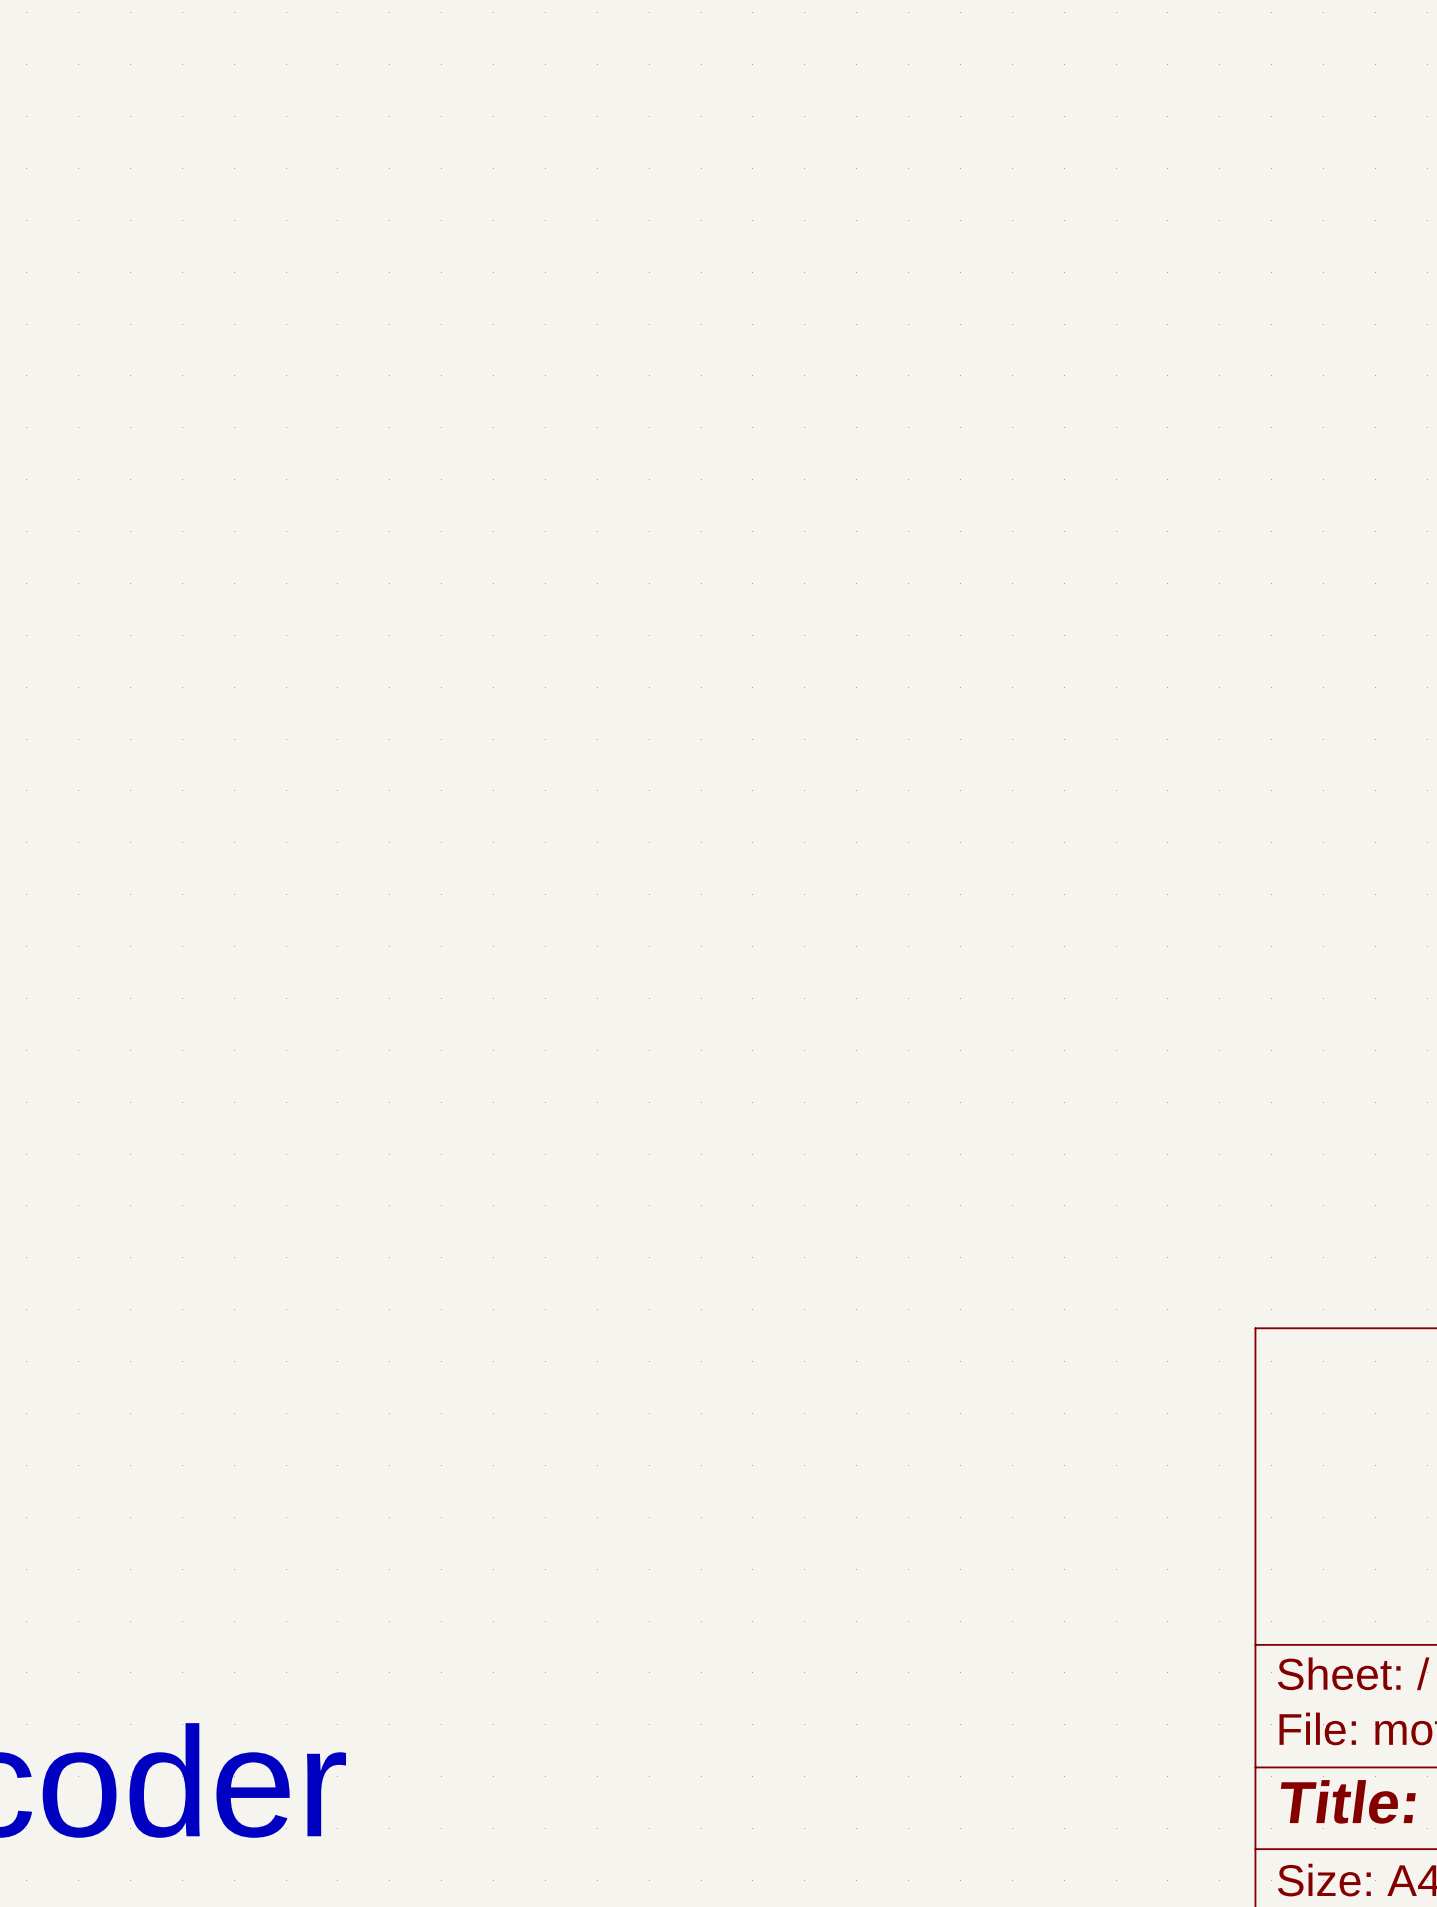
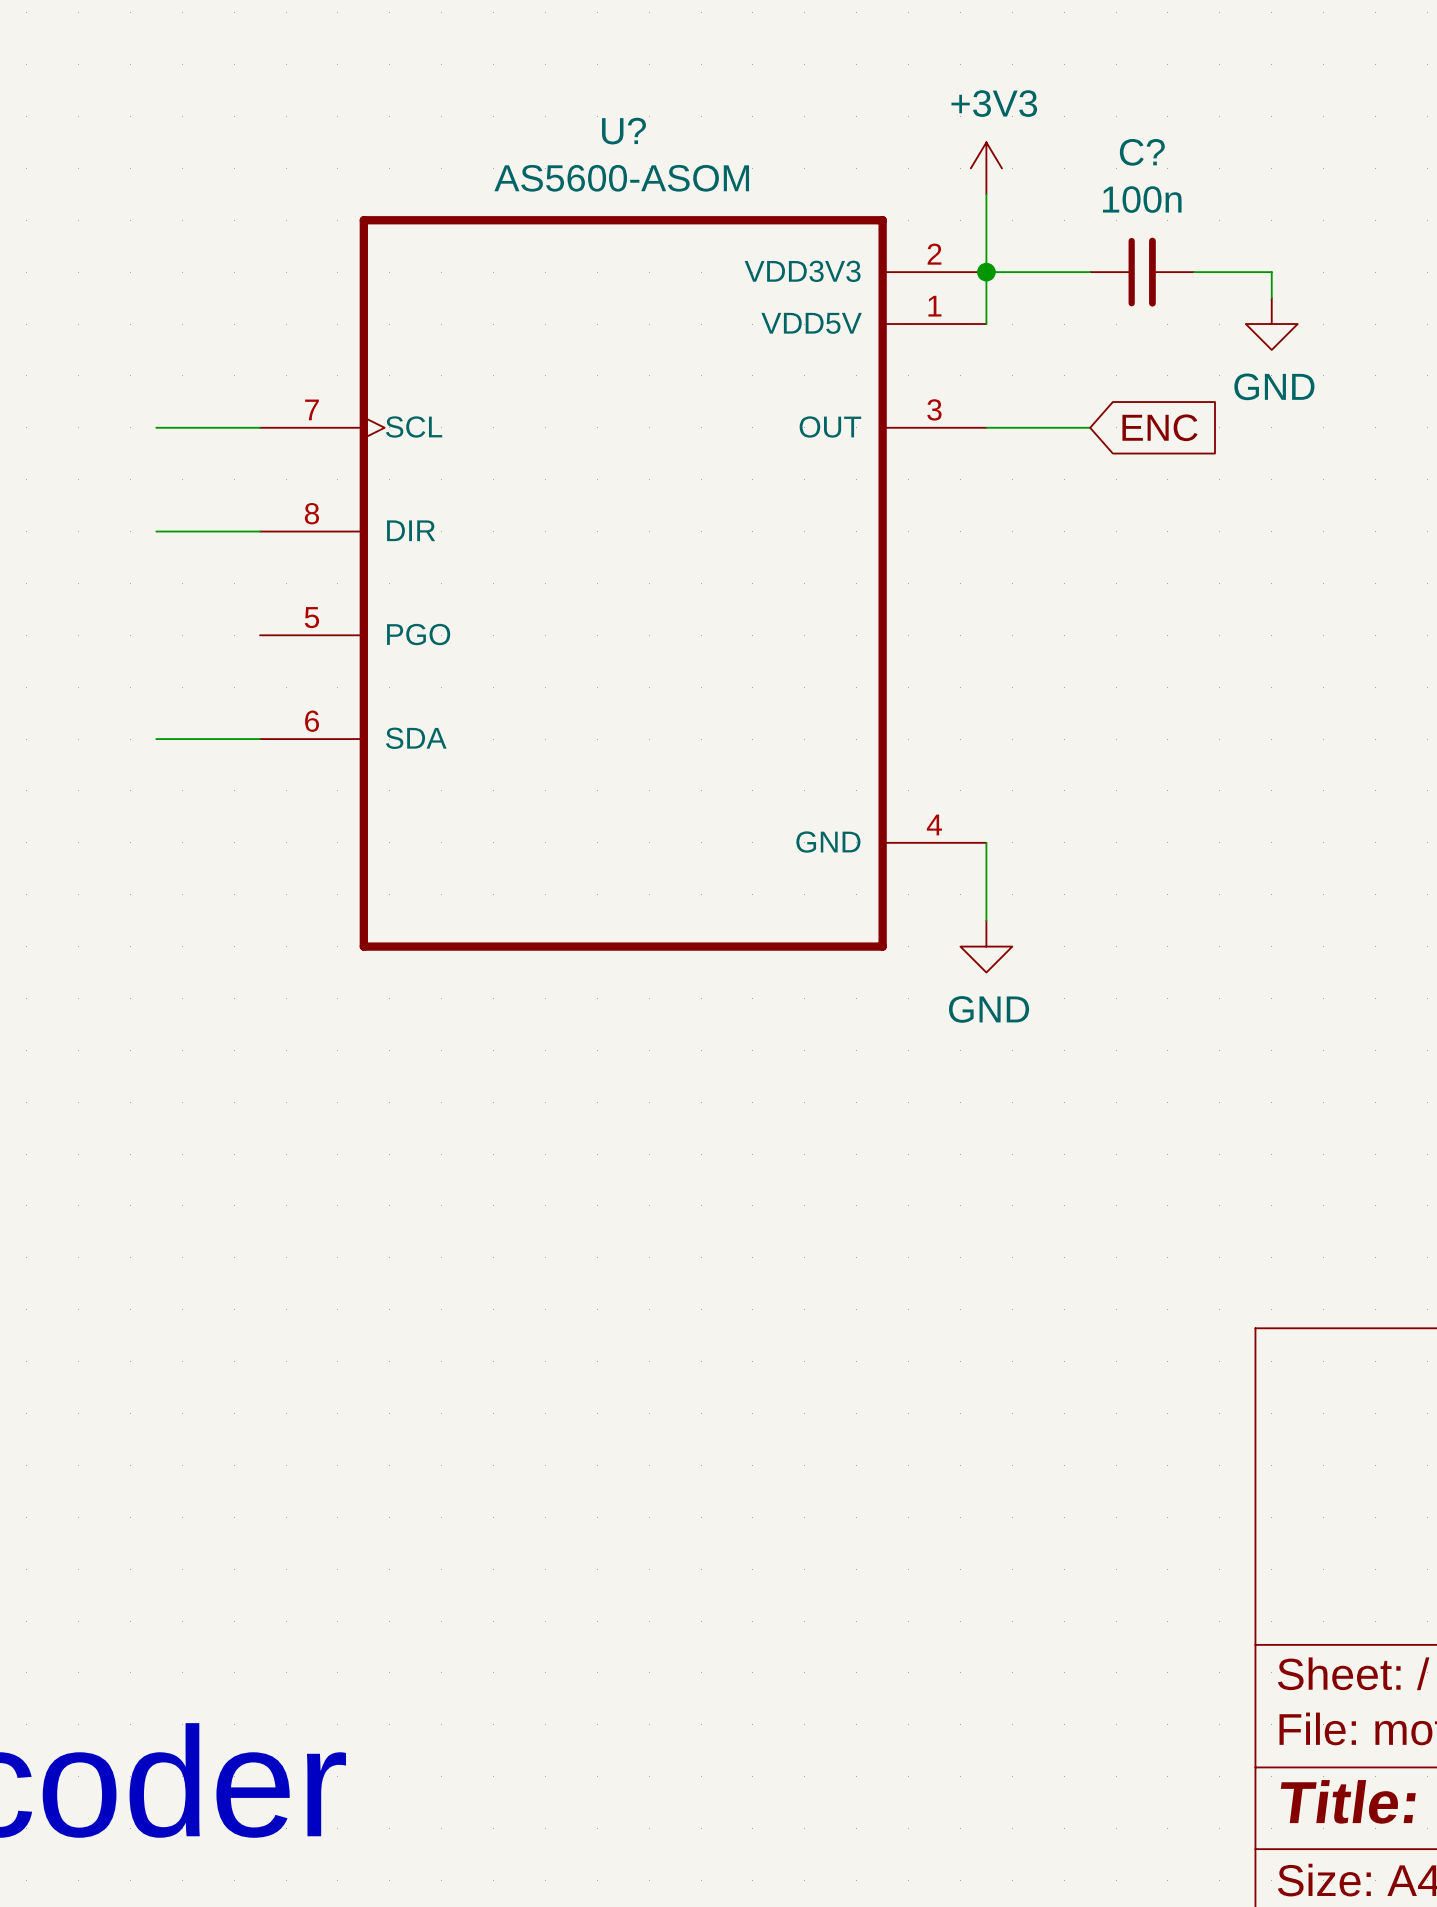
power symbol: none -> +3V3 (986, 168)
wire: none -> (986, 194) (986, 324)
wire: none -> (986, 272) (1090, 272)
junction: none -> (986, 272)
C?: none -> 100n (1142, 272)
wire: none -> (1193, 272) (1271, 272) (1271, 298)
power symbol: none -> GND (1271, 324)
wire: none -> (156, 427) (260, 427)
wire: none -> (986, 427) (1090, 427)
global label: none -> ENC (1159, 427)
wire: none -> (156, 531) (260, 531)
U?: none -> AS5600-ASOM (623, 583)
wire: none -> (156, 739) (260, 739)
wire: none -> (986, 842) (986, 920)
power symbol: none -> GND (986, 946)

